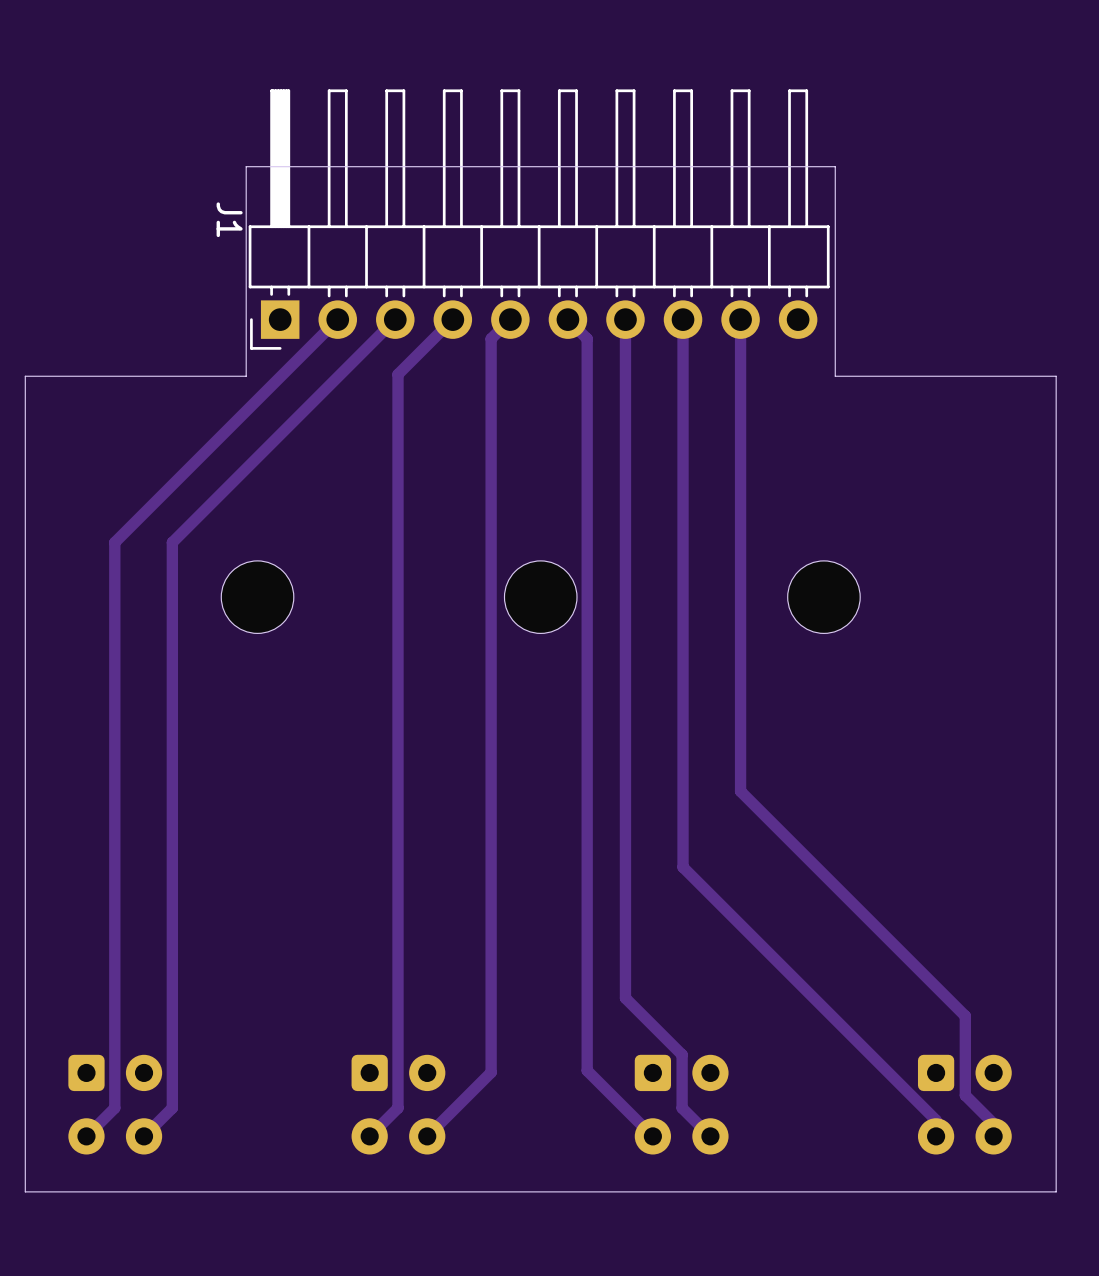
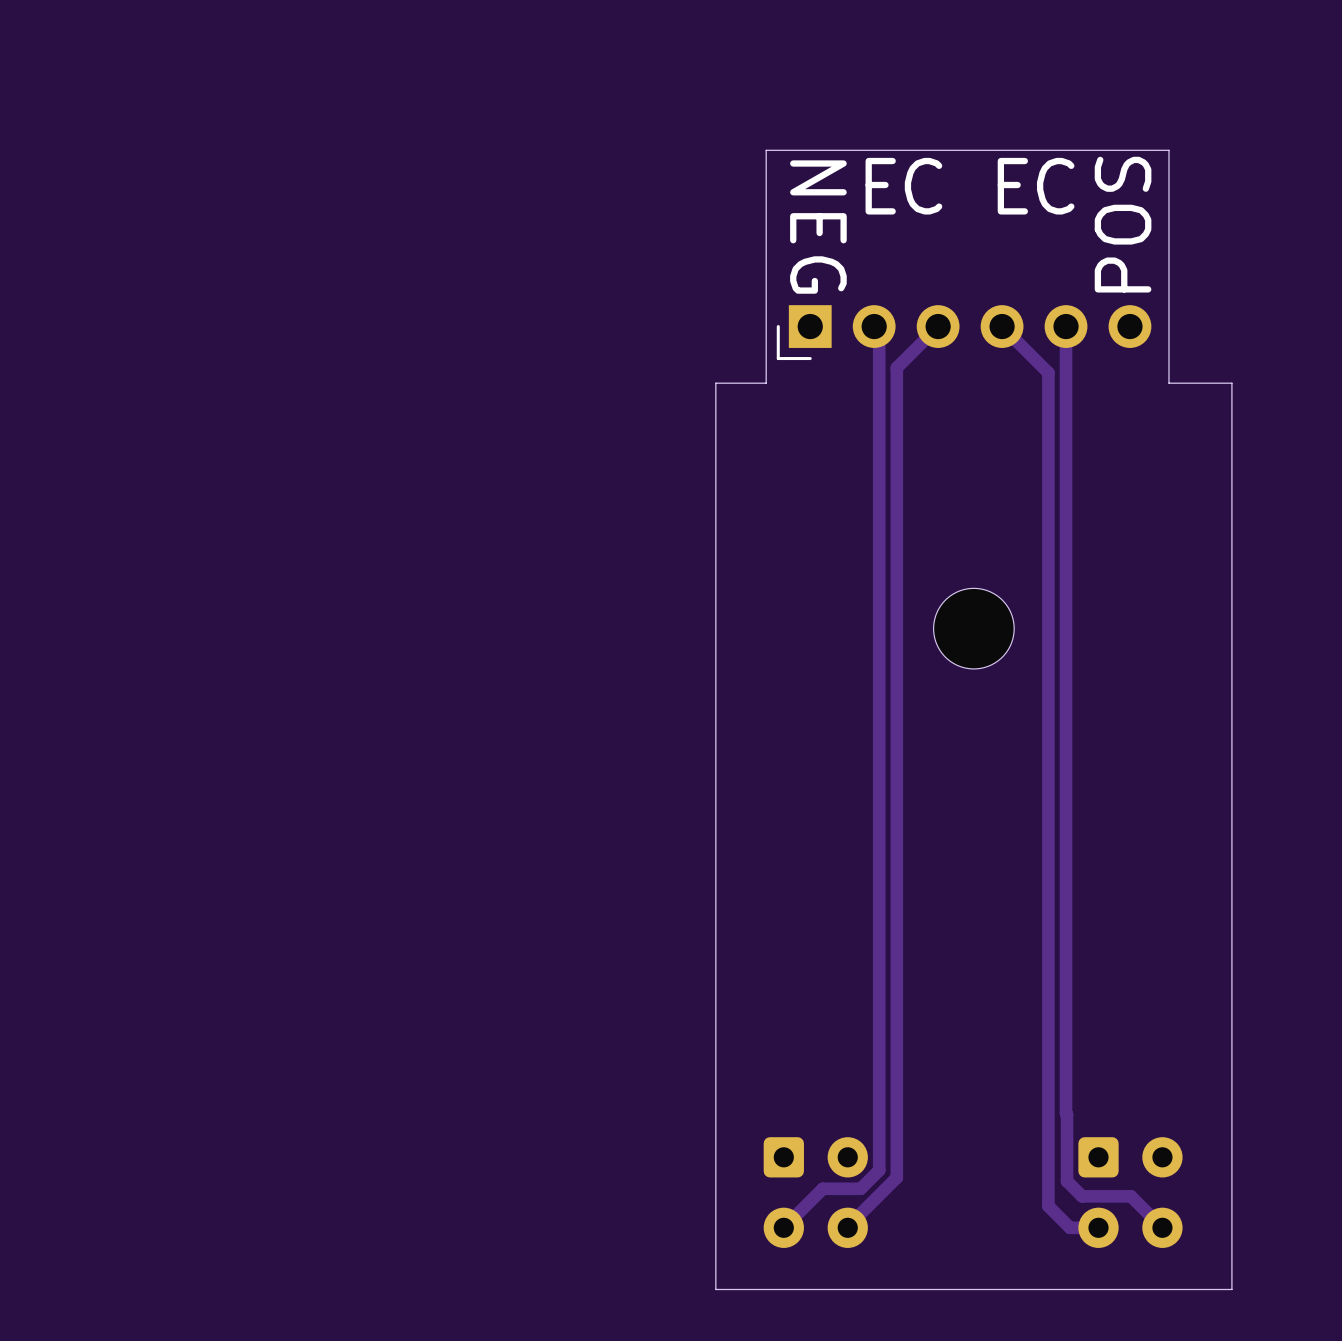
board edge: (637, 166) (246, 166) (246, 376) (25, 376) (25, 1191) (591, 1191) -> (766, 150) (766, 383) (715, 383) (715, 1289)
board edge: (835, 166) (835, 376) (999, 376) -> (986, 150) (1168, 150) (1168, 383)
text: none -> E (880, 186)
text: none -> C (923, 186)
text: none -> E (1012, 186)
text: none -> C (1055, 186)
J1: (539, 219) -> none
text: none -> POS (1123, 224)
text: none -> NEG (818, 227)
track: (337, 319) (114, 542) (114, 1108) (86, 1136) -> none
track: (395, 319) (172, 542) (172, 1108) (144, 1136) -> none
track: (452, 319) (398, 374) (398, 1108) (369, 1136) -> none
track: (510, 319) (491, 338) (491, 1072) (427, 1136) -> none
track: (567, 319) (587, 338) (587, 1070) (652, 1136) -> (874, 326) (879, 331) (879, 1170) (860, 1188) (822, 1188) (783, 1227)
track: (625, 319) (625, 998) (682, 1054) (682, 1108) (710, 1136) -> (938, 326) (896, 367) (896, 1177) (847, 1227)
track: (683, 319) (683, 867) (936, 1120) (936, 1136) -> (1002, 326) (1048, 372) (1048, 1206) (1070, 1227) (1098, 1227)
track: (740, 319) (740, 791) (965, 1016) (965, 1095) (993, 1123) (993, 1136) -> (1066, 326) (1067, 1181) (1082, 1196) (1130, 1196) (1162, 1227)
part: none -> (964, 332)
part: (257, 597) -> none
part: (540, 597) -> none
part: (115, 1104) -> none
part: (398, 1104) -> none

